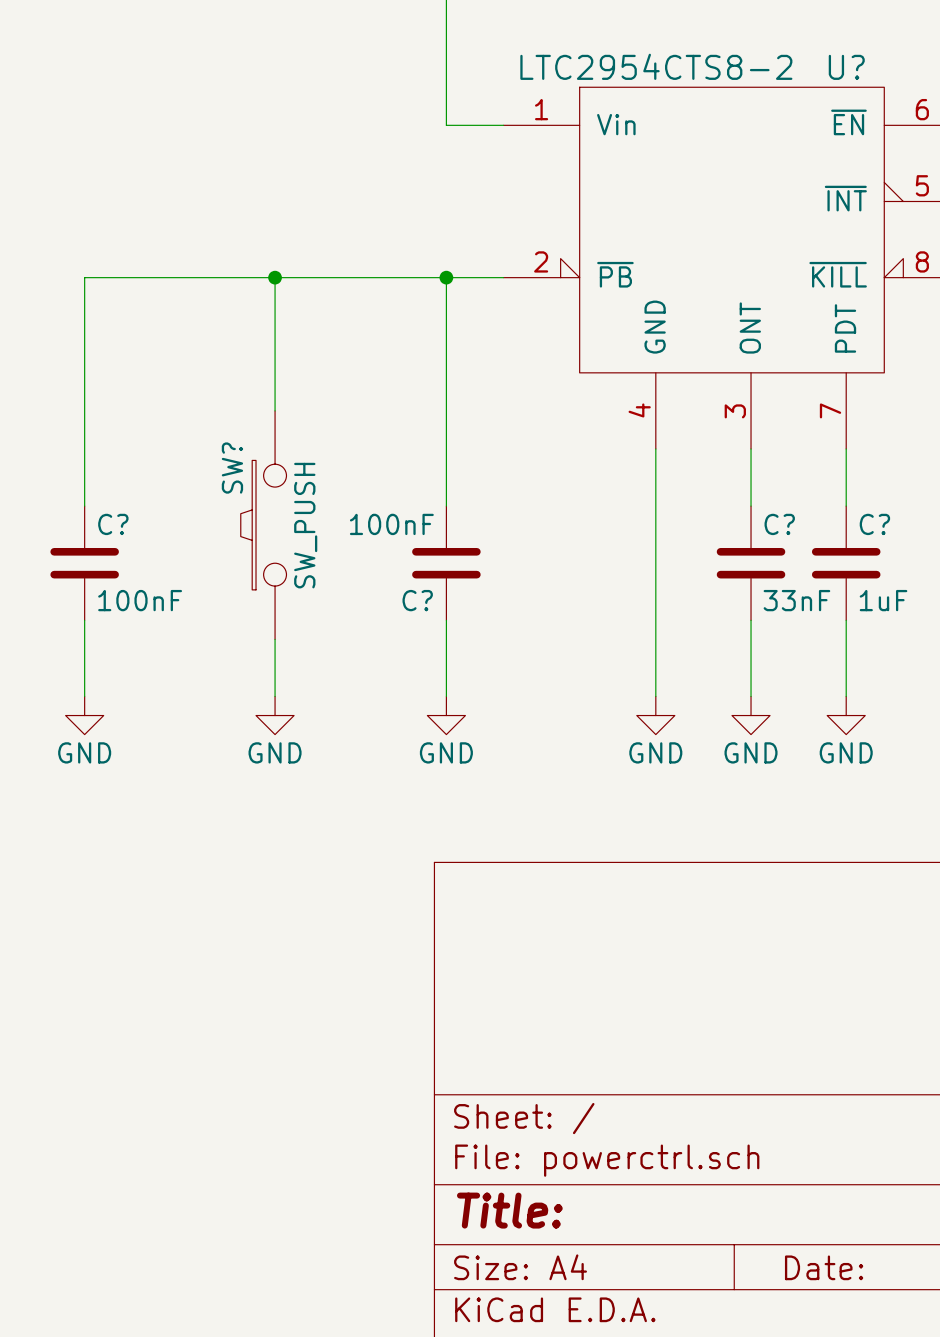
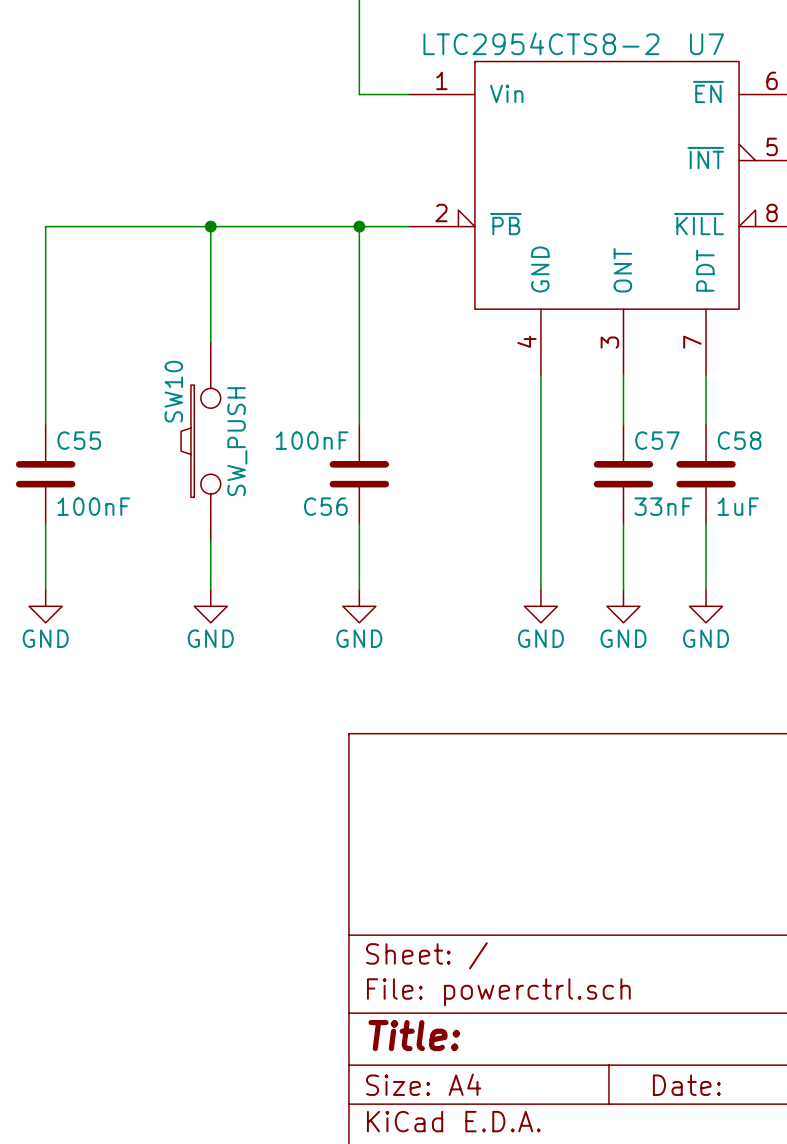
U? name: U? (846, 67) -> U7 (706, 44)
SW? name: SW? (232, 468) -> SW10 (173, 391)
C? name: C? (113, 524) -> C55 (79, 440)
C? name: C? (779, 524) -> C57 (657, 440)
C? name: C? (874, 524) -> C58 (739, 440)
C? name: C? (417, 600) -> C56 (325, 506)

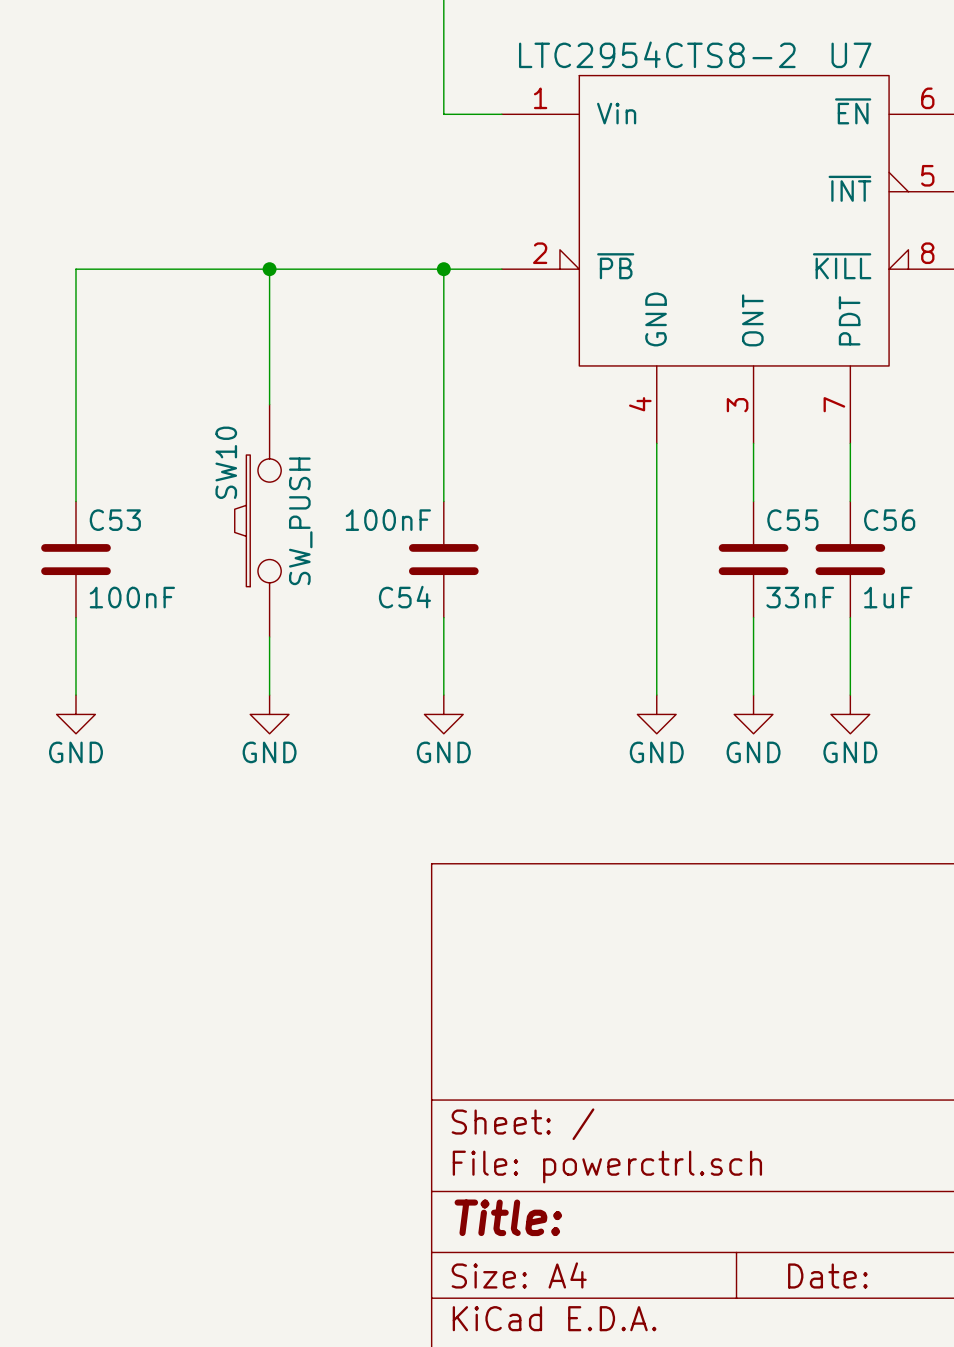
C55 name: C55 (79, 440) -> C53 (115, 520)
C57 name: C57 (657, 440) -> C55 (792, 520)
C58 name: C58 (739, 440) -> C56 (889, 520)
C56 name: C56 (325, 506) -> C54 (404, 597)

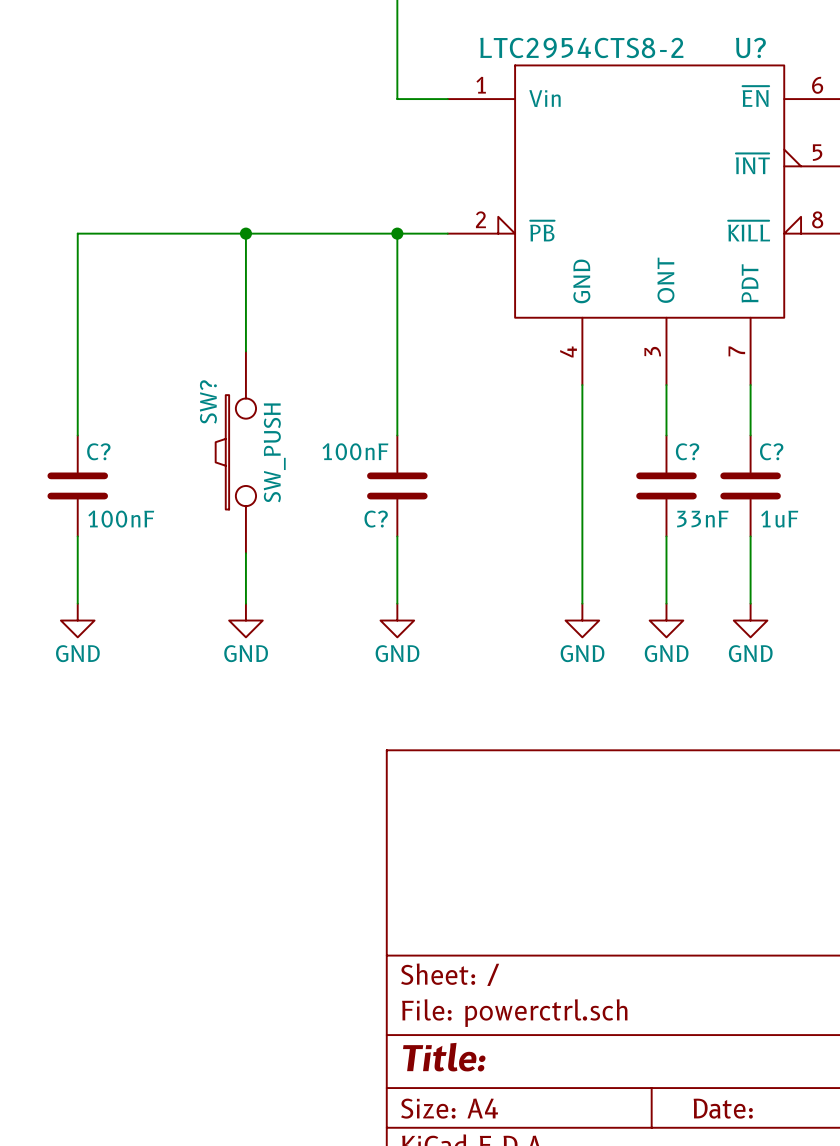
U7 name: U7 (851, 55) -> U? (750, 47)
SW10 name: SW10 (226, 462) -> SW? (208, 401)
C53 name: C53 (115, 520) -> C? (98, 451)
C55 name: C55 (792, 520) -> C? (687, 451)
C56 name: C56 (889, 520) -> C? (771, 451)
C54 name: C54 (404, 597) -> C? (376, 519)

